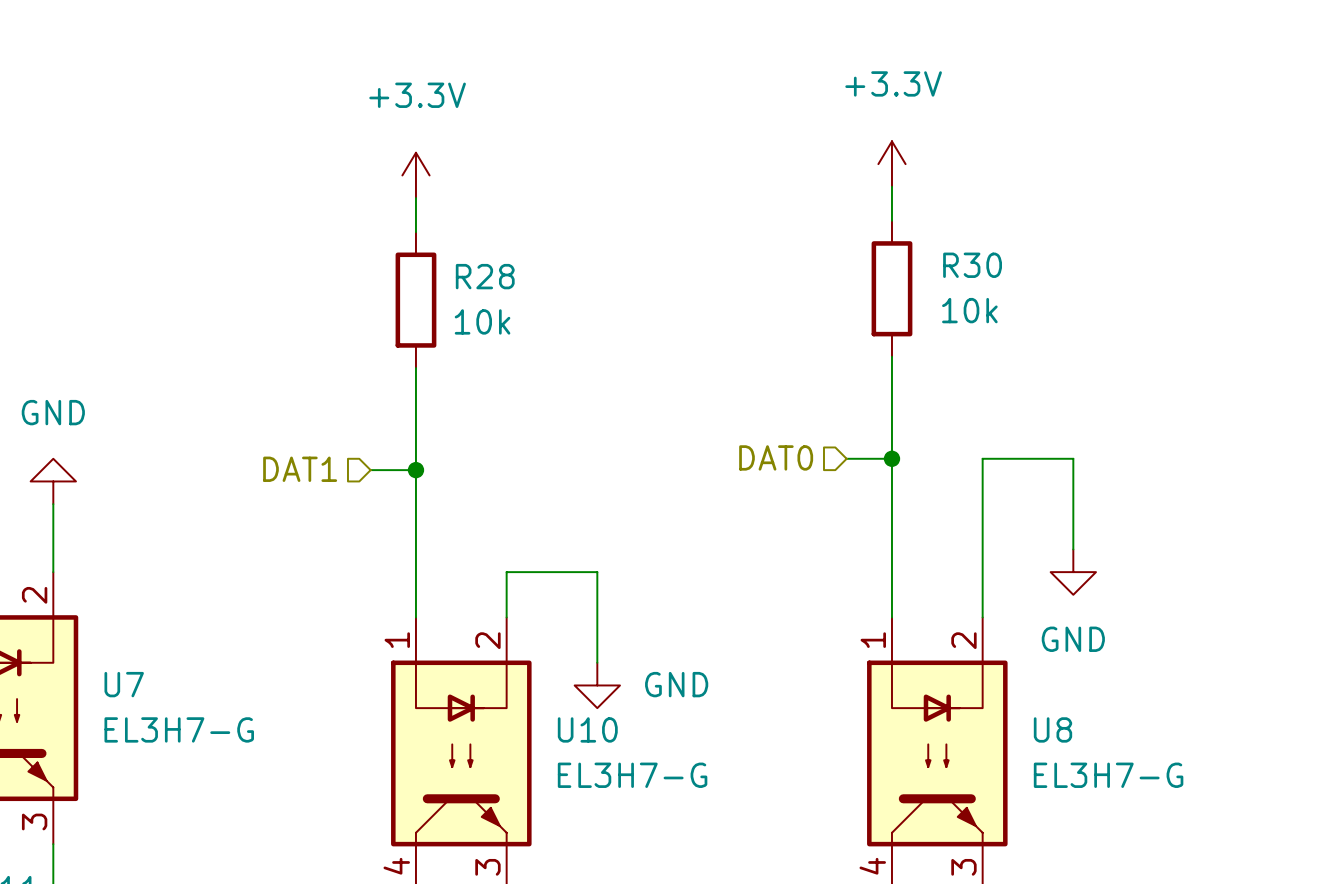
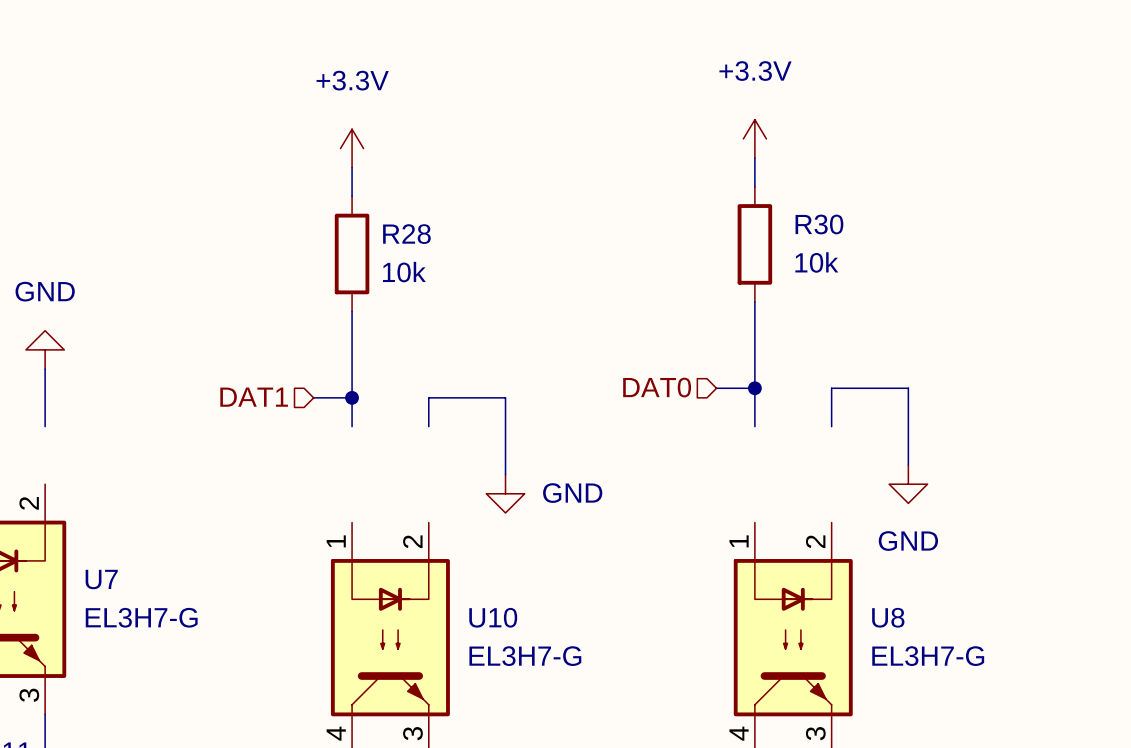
power symbol position: GND (53, 481) -> GND (45, 349)
wire: (53, 504) (53, 572) -> (45, 426) (45, 369)
wire: (415, 504) (415, 617) -> none
wire: none -> (428, 426) (428, 397) (505, 397) (505, 474)
wire: (891, 504) (891, 617) -> none
wire: (982, 504) (982, 617) -> none
wire: (506, 617) (506, 572) (597, 572) (597, 662) -> none
power symbol position: GND (597, 685) -> GND (505, 493)

